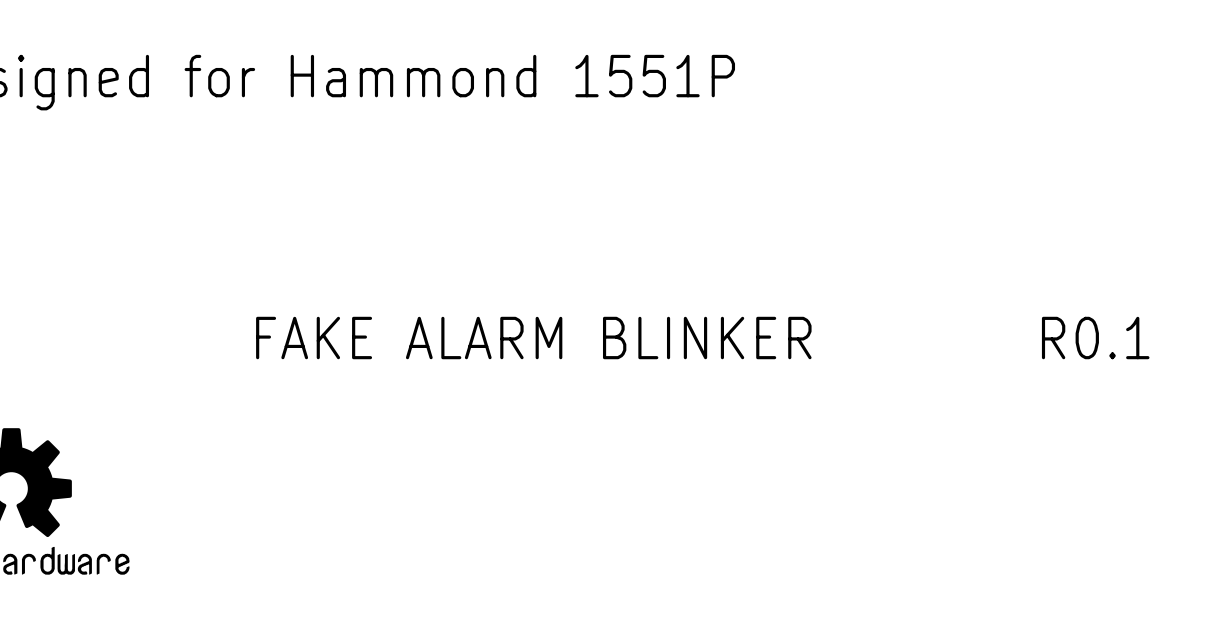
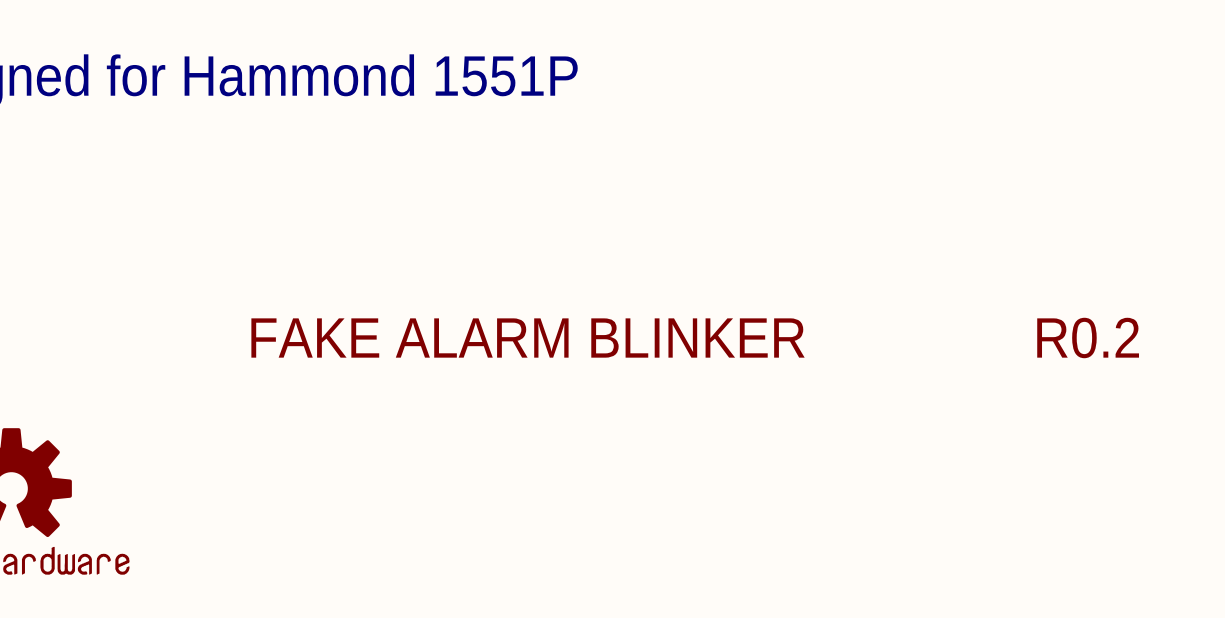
text: R0.1 (1095, 338) -> R0.2 (1088, 337)

